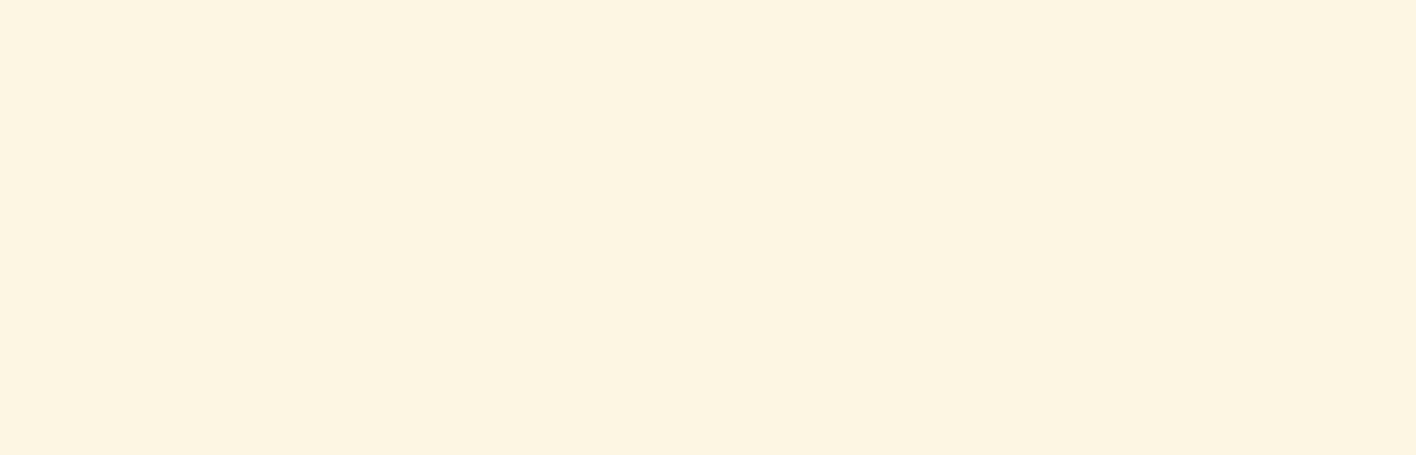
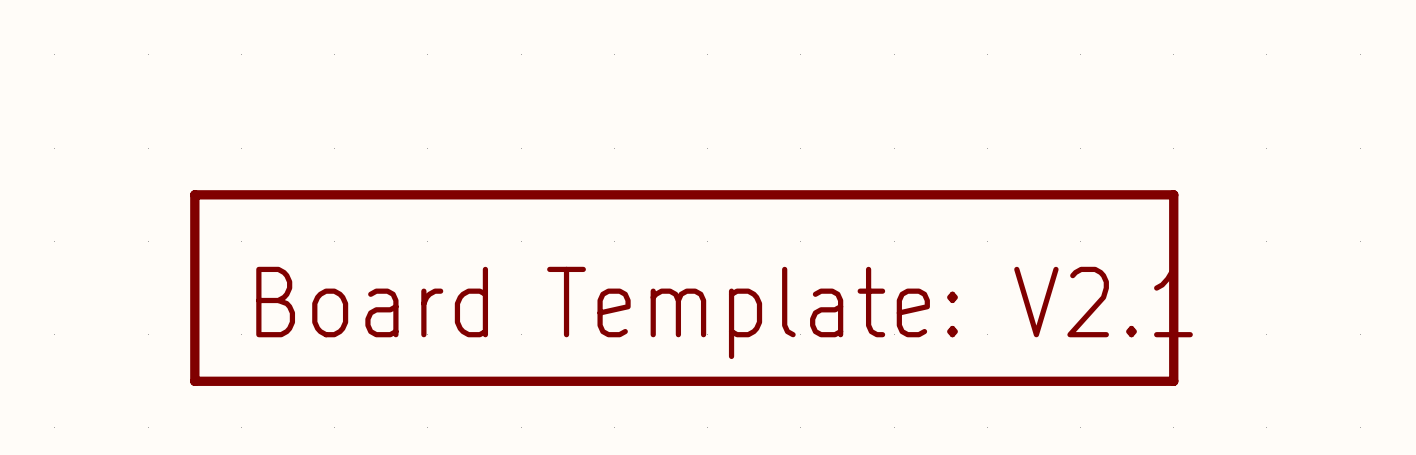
part: none -> (684, 288)

